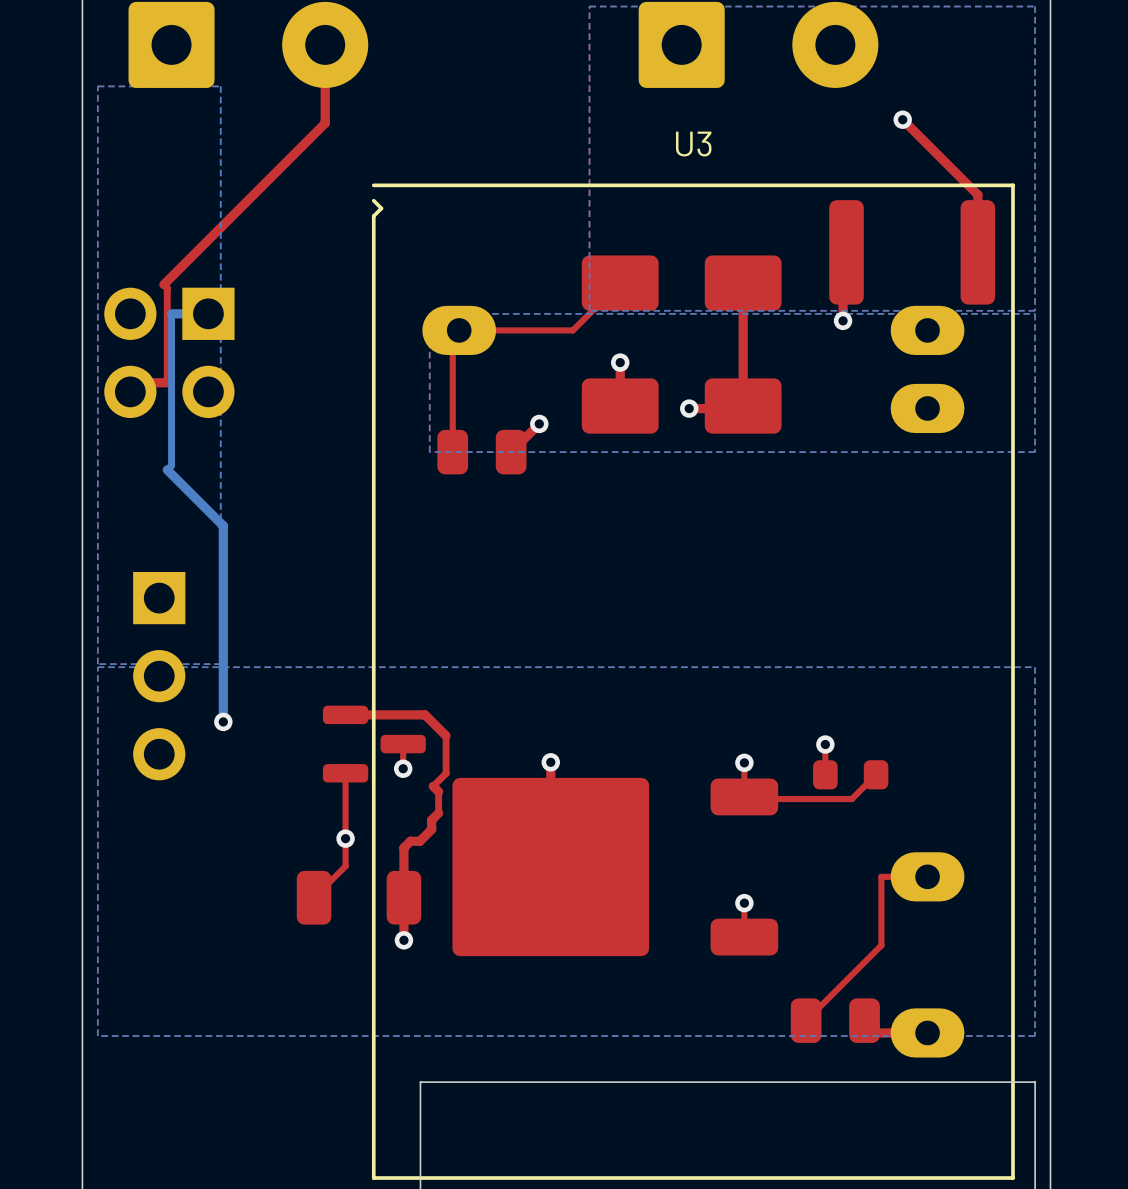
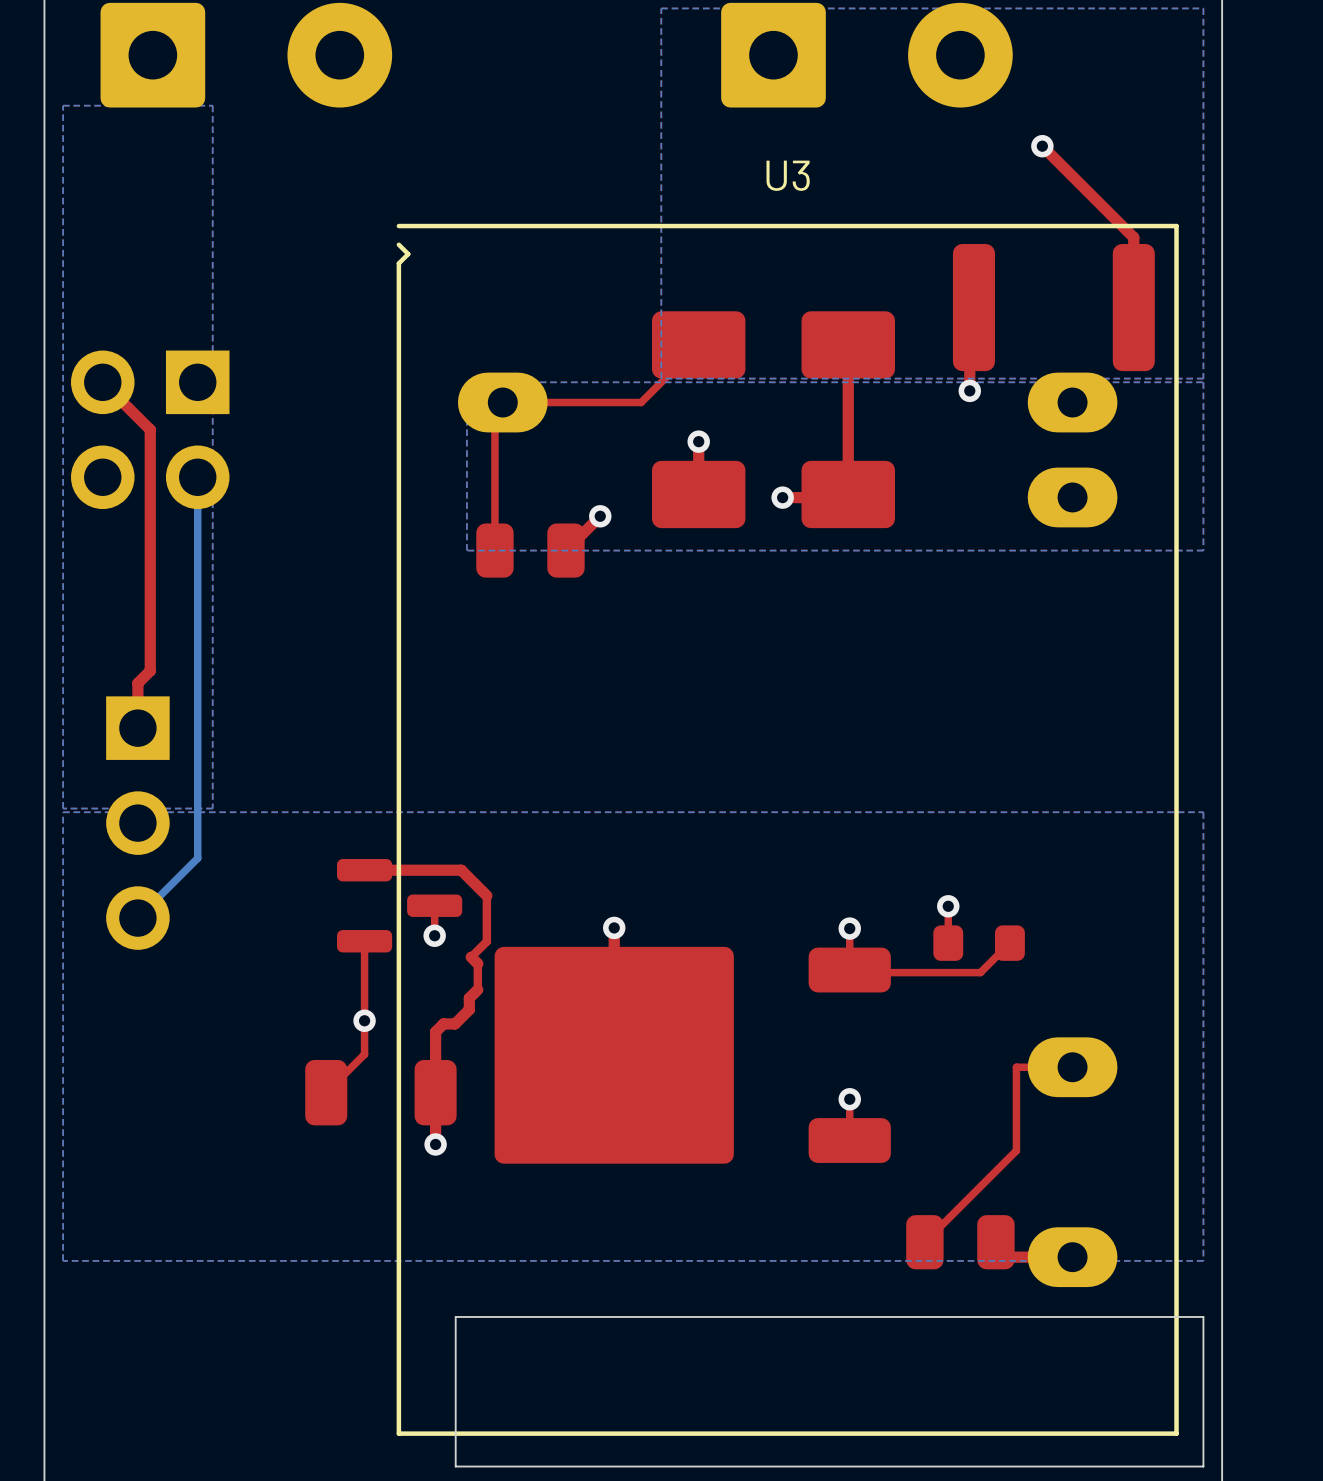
top track: (325, 44) (325, 123) (163, 284) (167, 288) (167, 382) (139, 382) (130, 391) -> none
top track: none -> (102, 382) (150, 429) (150, 670) (137, 683) (137, 728)
bottom track: (208, 313) (171, 313) (171, 465) (167, 469) (223, 525) (223, 721) -> none
bottom track: none -> (197, 477) (197, 858) (137, 918)
via: (223, 721) -> none

